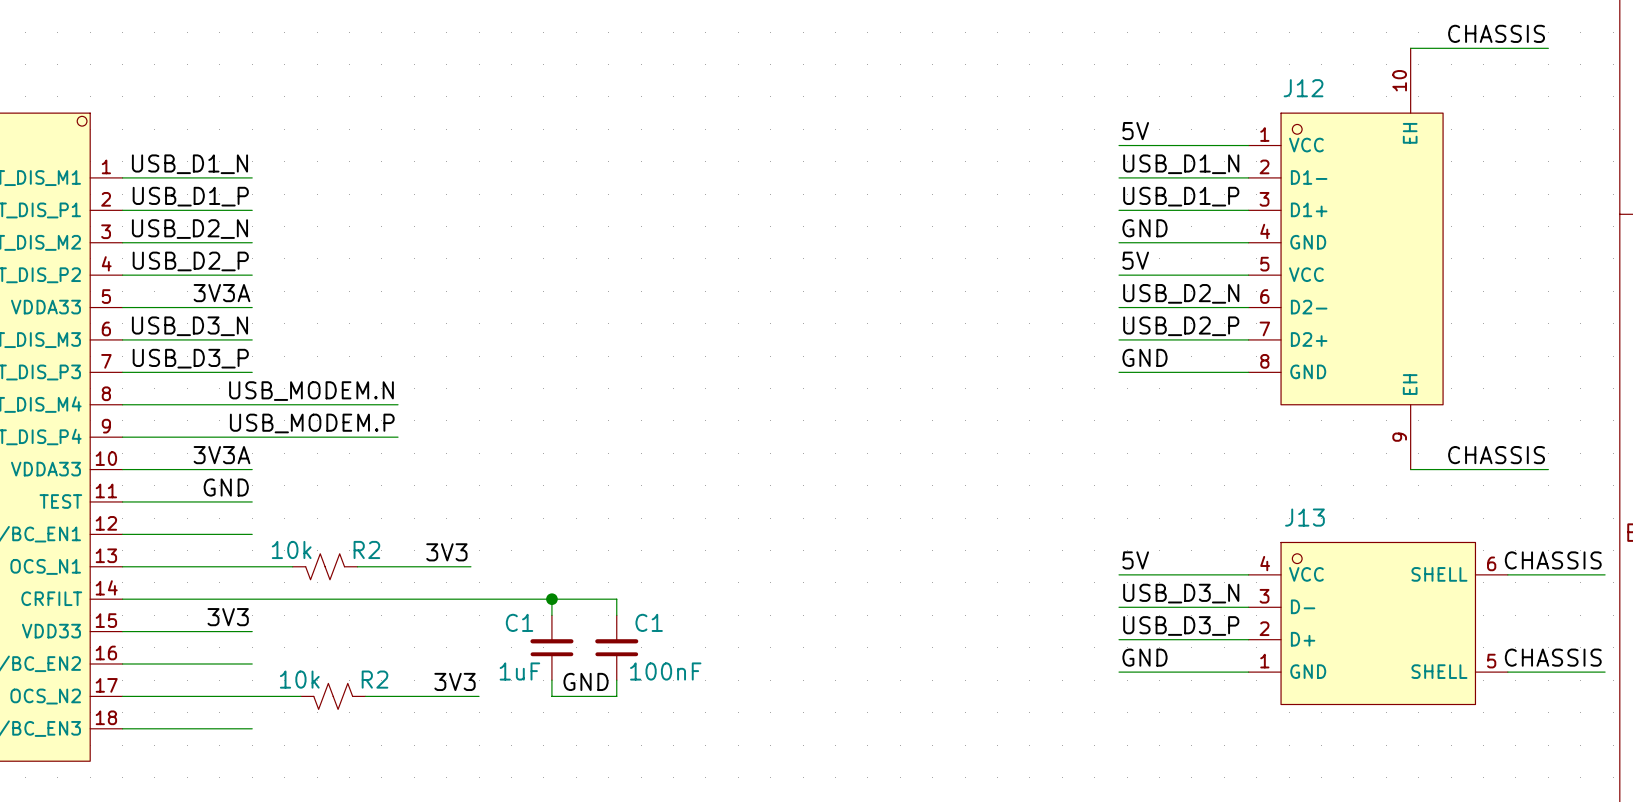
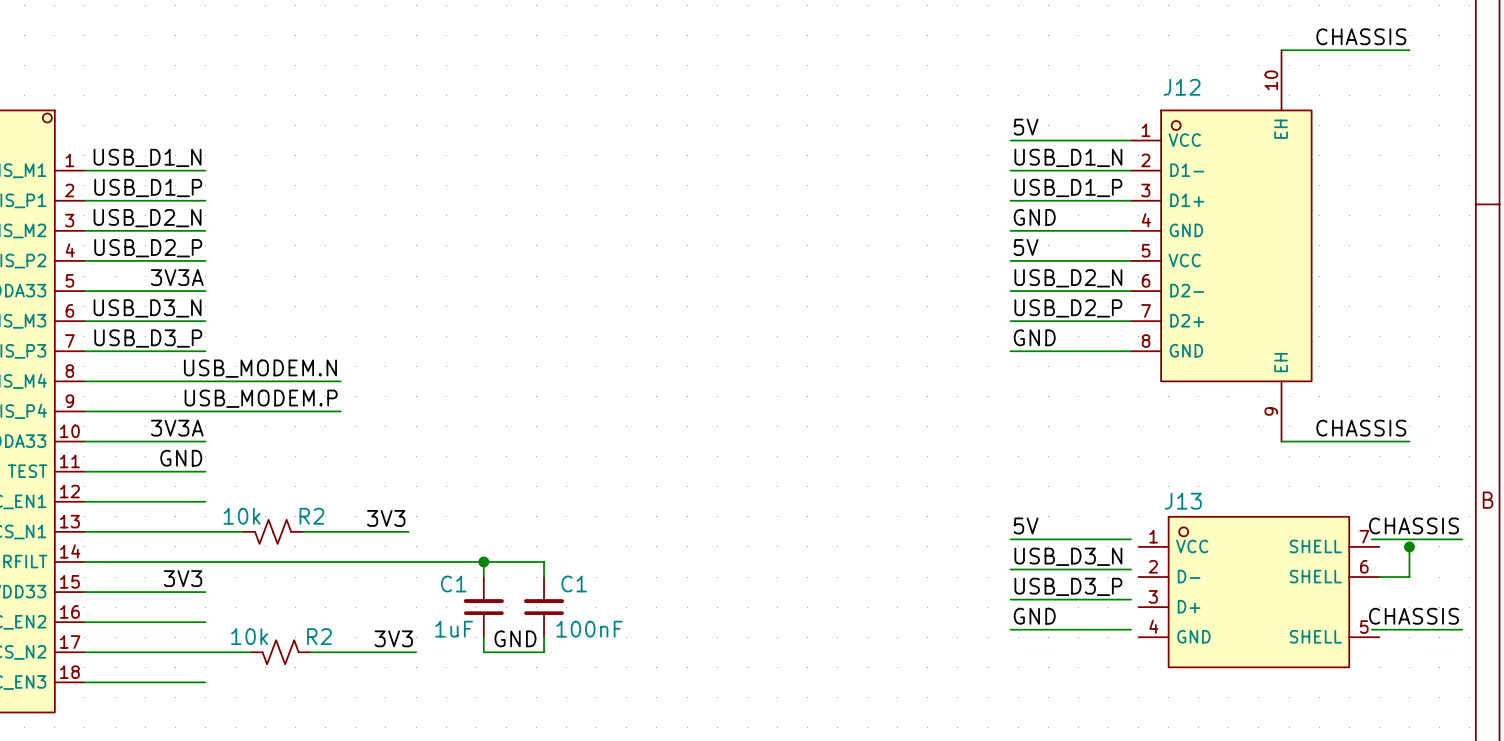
J13 symbol: [1248, 542, 1508, 705] -> [1138, 516, 1380, 668]
wire: none -> (1409, 546) (1409, 577) (1379, 577)
junction: none -> (1409, 546)

